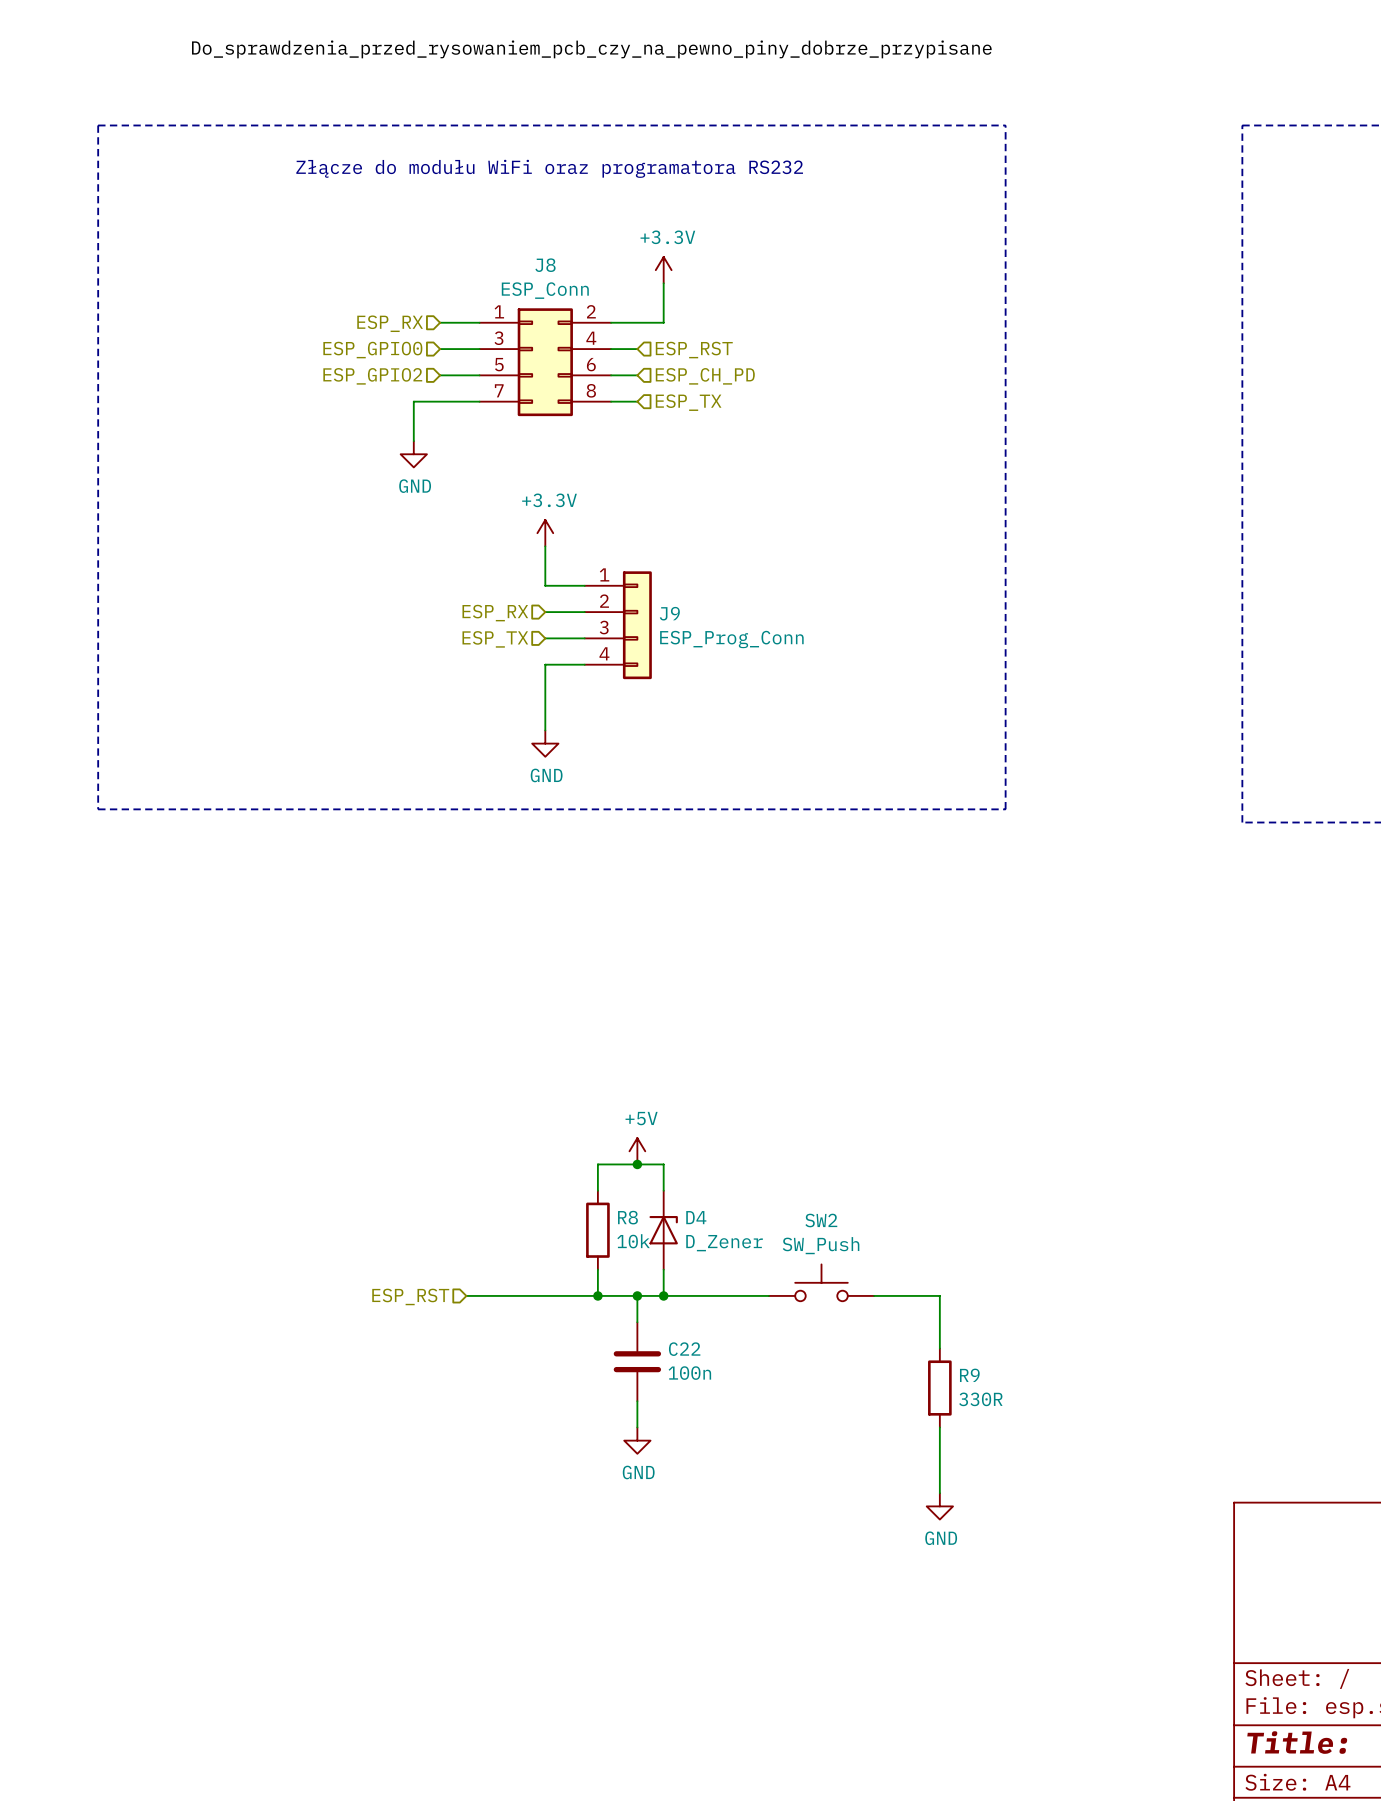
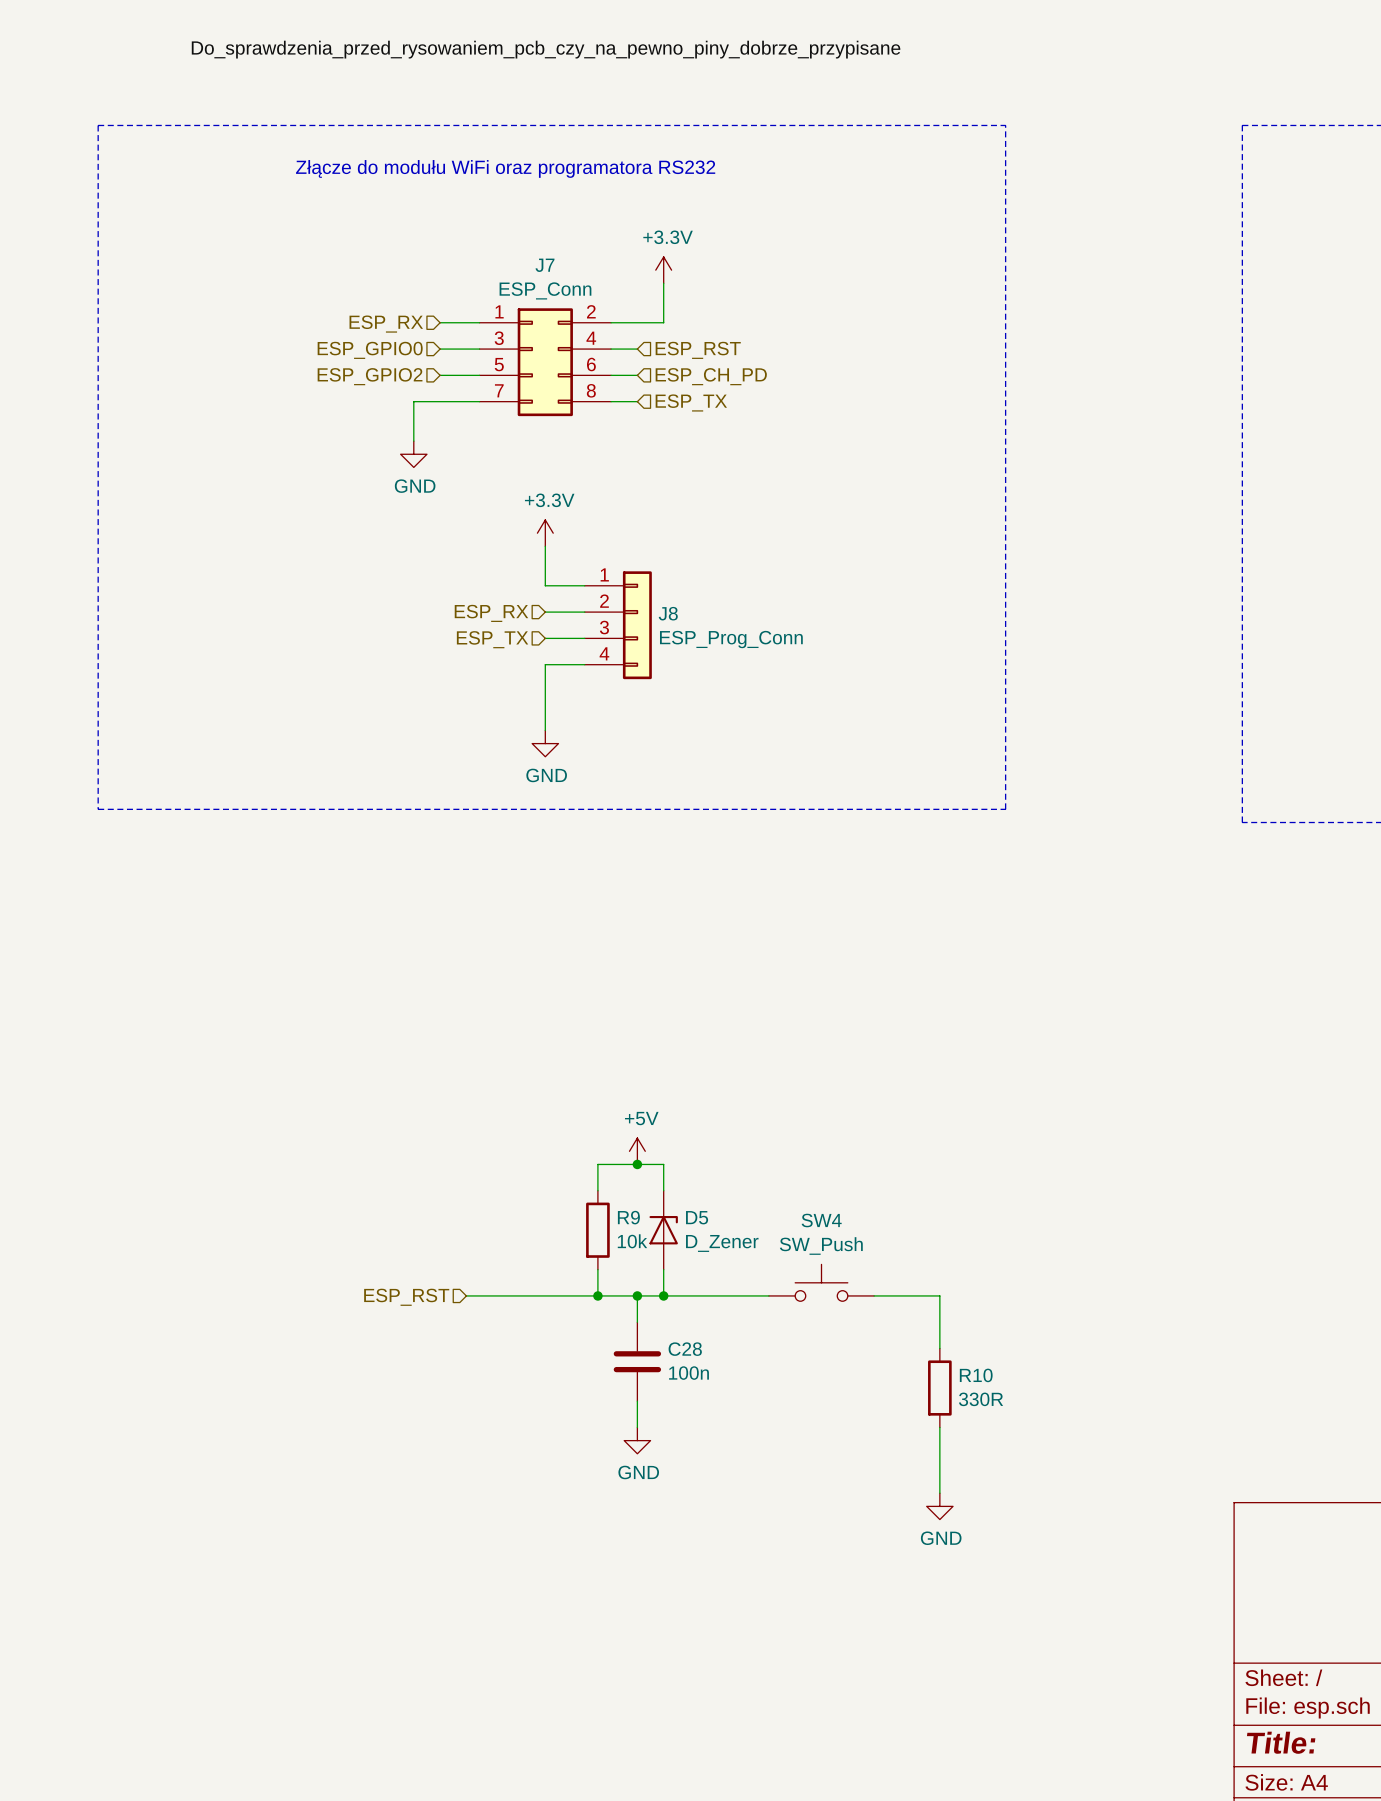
J8 name: J8 (545, 265) -> J7 (544, 265)
J9 name: J9 (669, 613) -> J8 (668, 613)
R8 name: R8 (627, 1217) -> R9 (628, 1217)
D4 name: D4 (696, 1217) -> D5 (697, 1217)
SW2 name: SW2 (821, 1220) -> SW4 (821, 1220)
C22 name: C22 (684, 1349) -> C28 (685, 1349)
R9 name: R9 (969, 1375) -> R10 (976, 1375)

